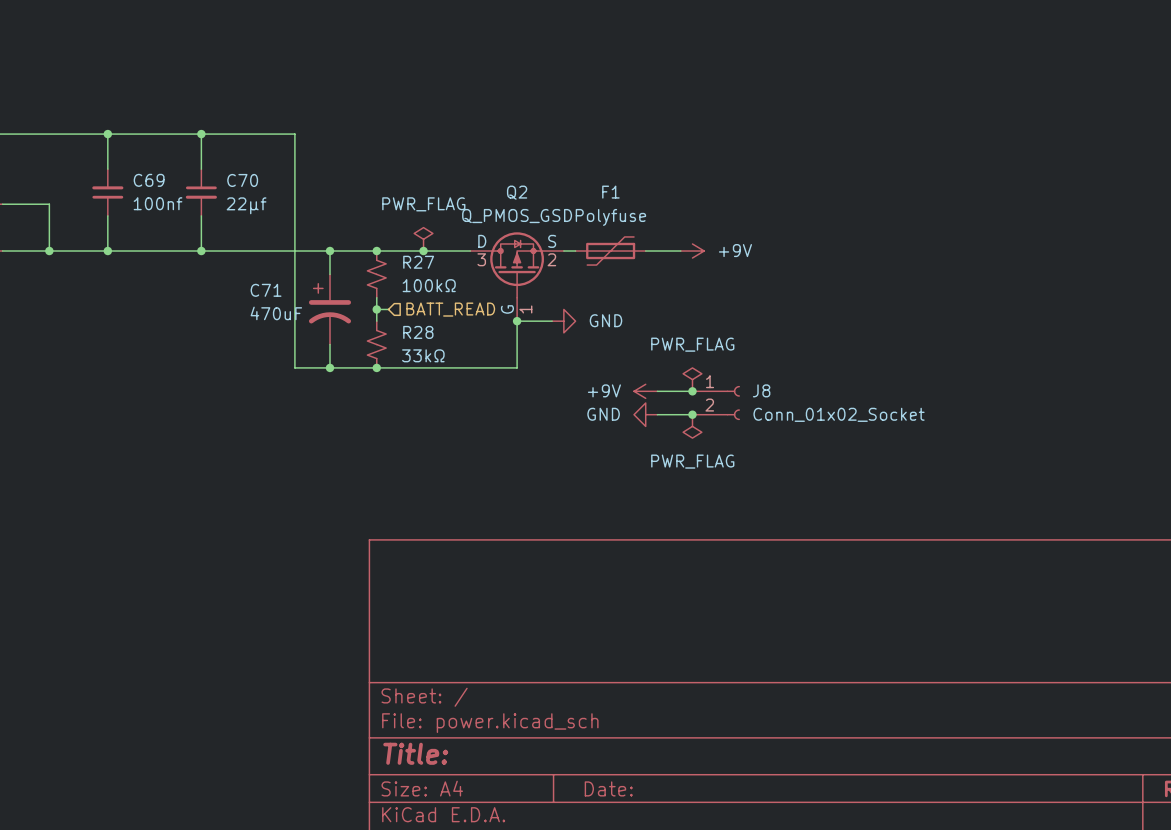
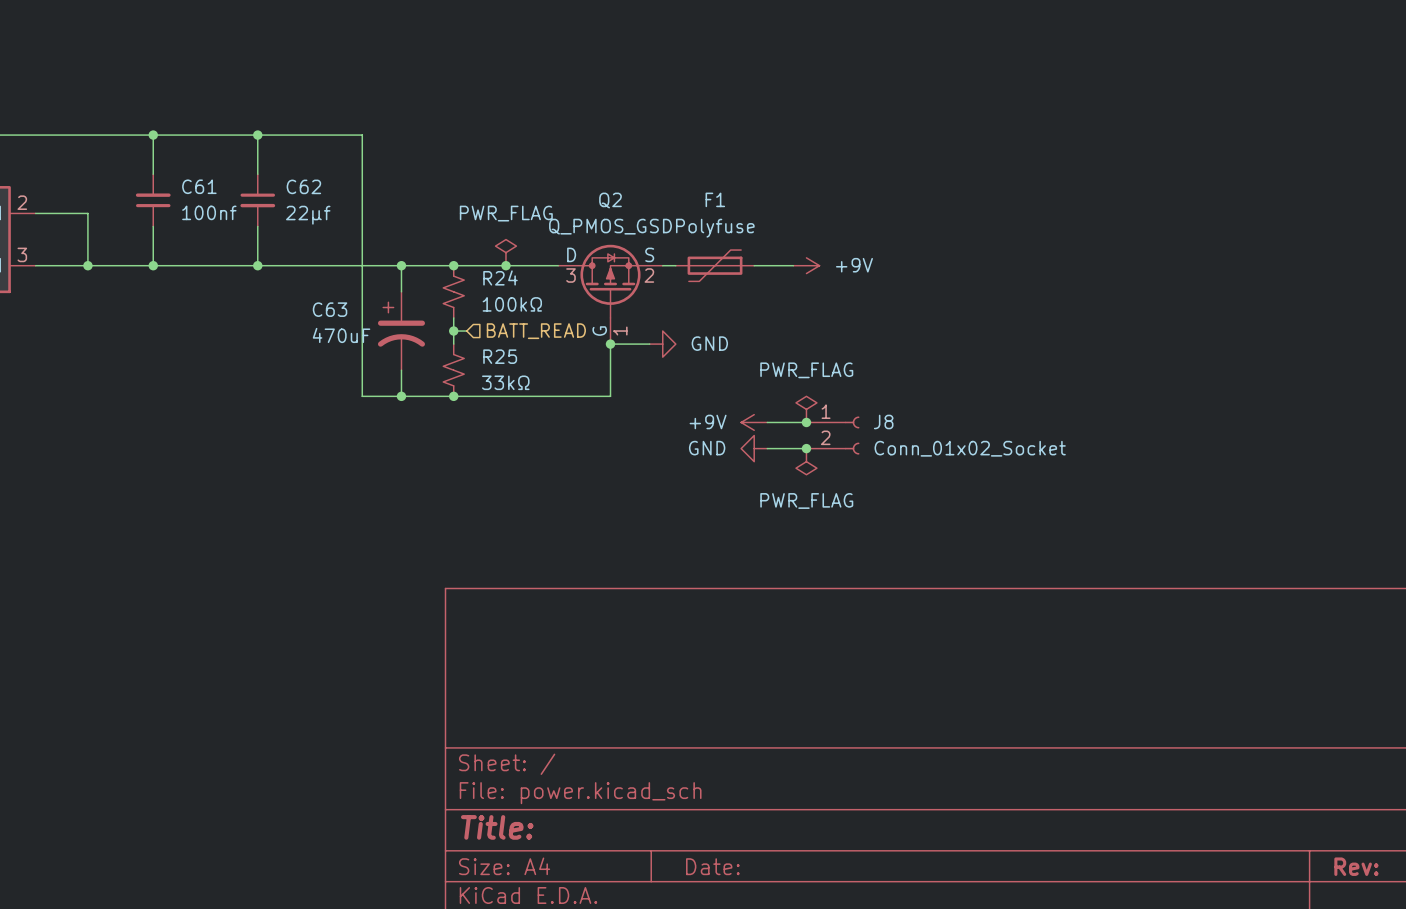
C69 name: C69 (149, 180) -> C61 (199, 186)
C70 name: C70 (242, 180) -> C62 (303, 186)
R27 name: R27 (418, 262) -> R24 (500, 277)
C71 name: C71 (266, 290) -> C63 (330, 309)
R28 name: R28 (418, 332) -> R25 (500, 356)

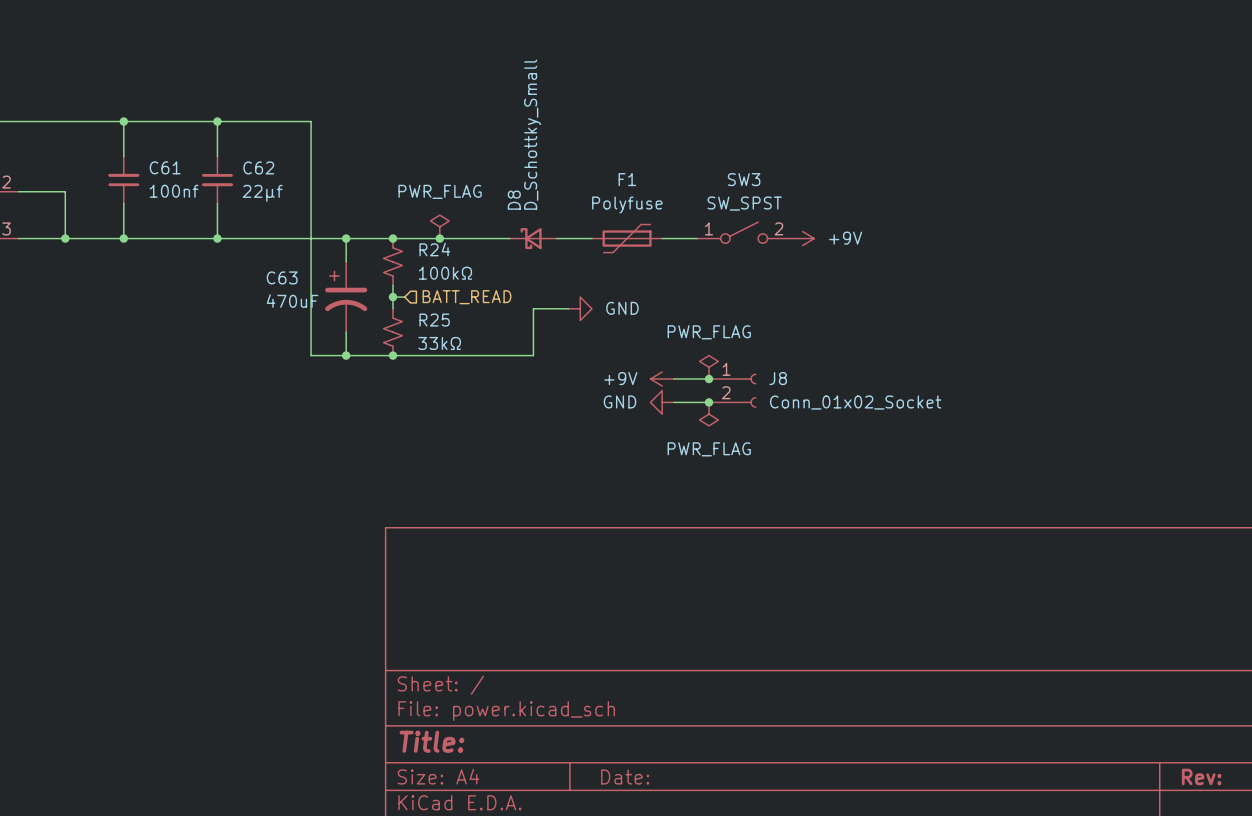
SW3: none -> SW_SPST (744, 232)
D8: none -> D_Schottky_Small (533, 238)
power symbol position: +9V (806, 265) -> +9V (802, 238)
Q2: Q_PMOS_GSD (610, 294) -> none
junction: (610, 344) -> none

